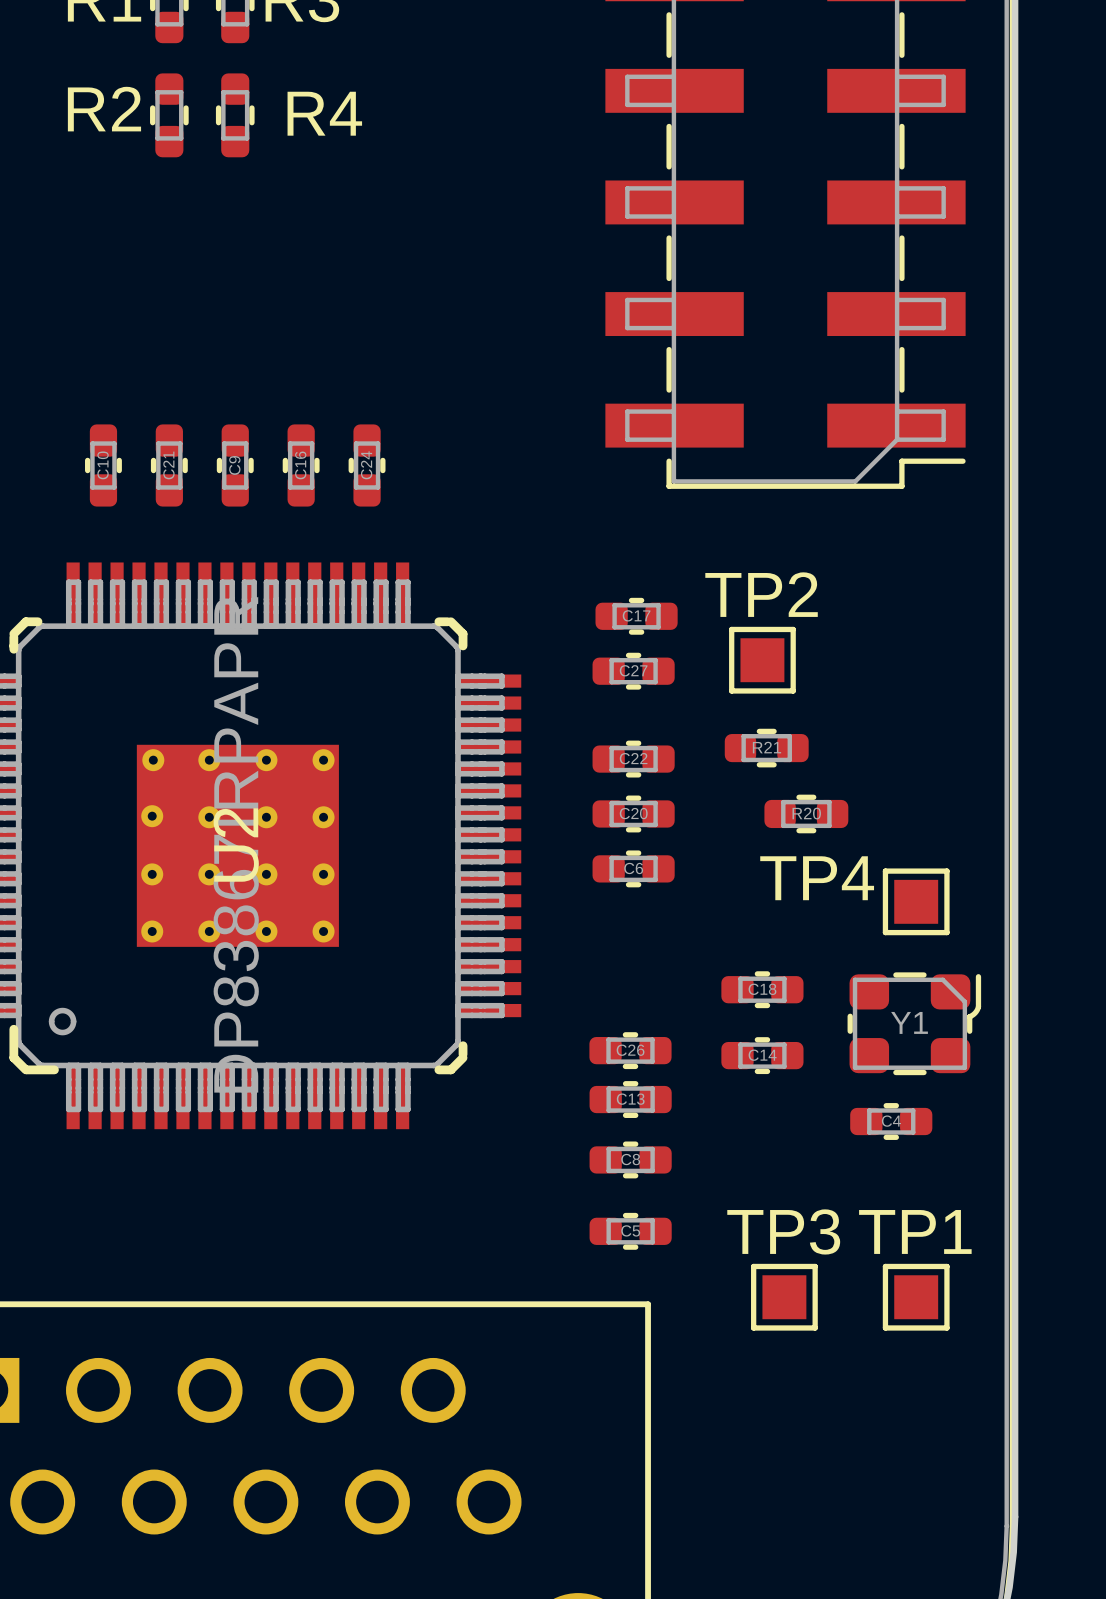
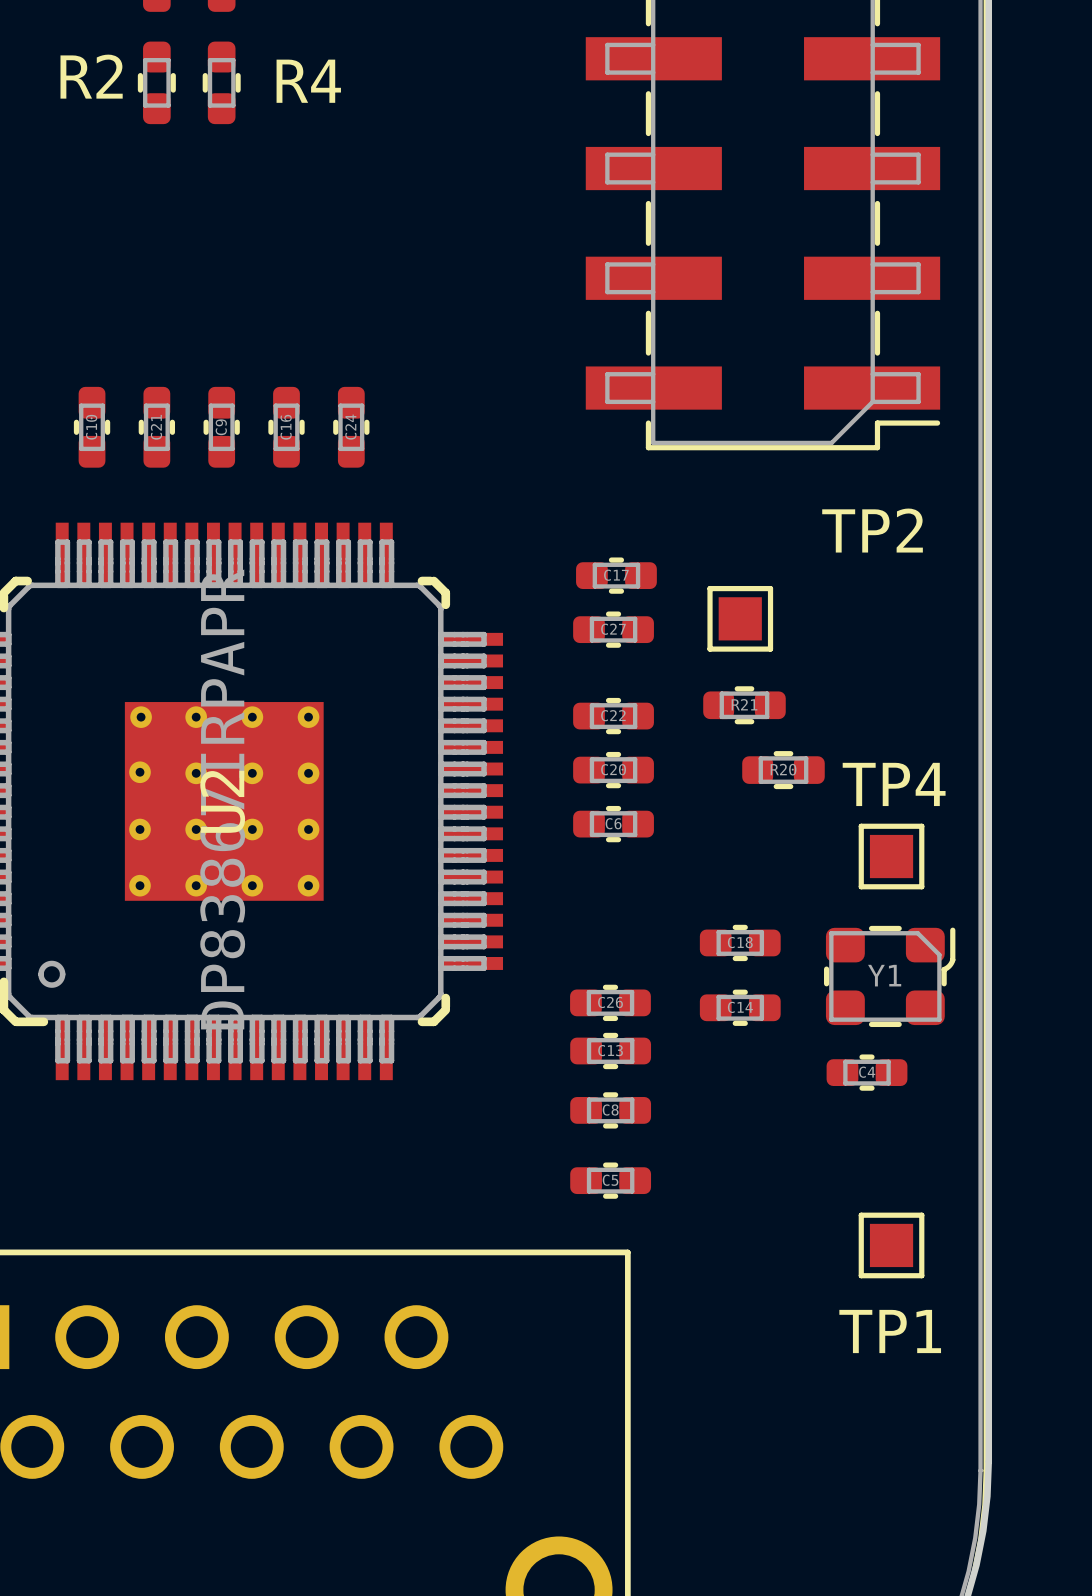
TP2 name position: TP2 (761, 594) -> TP2 (872, 530)
TP4 name position: TP4 (817, 878) -> TP4 (894, 784)
TP1 name position: TP1 (915, 1231) -> TP1 (890, 1331)
TP3: (784, 1297) -> none

